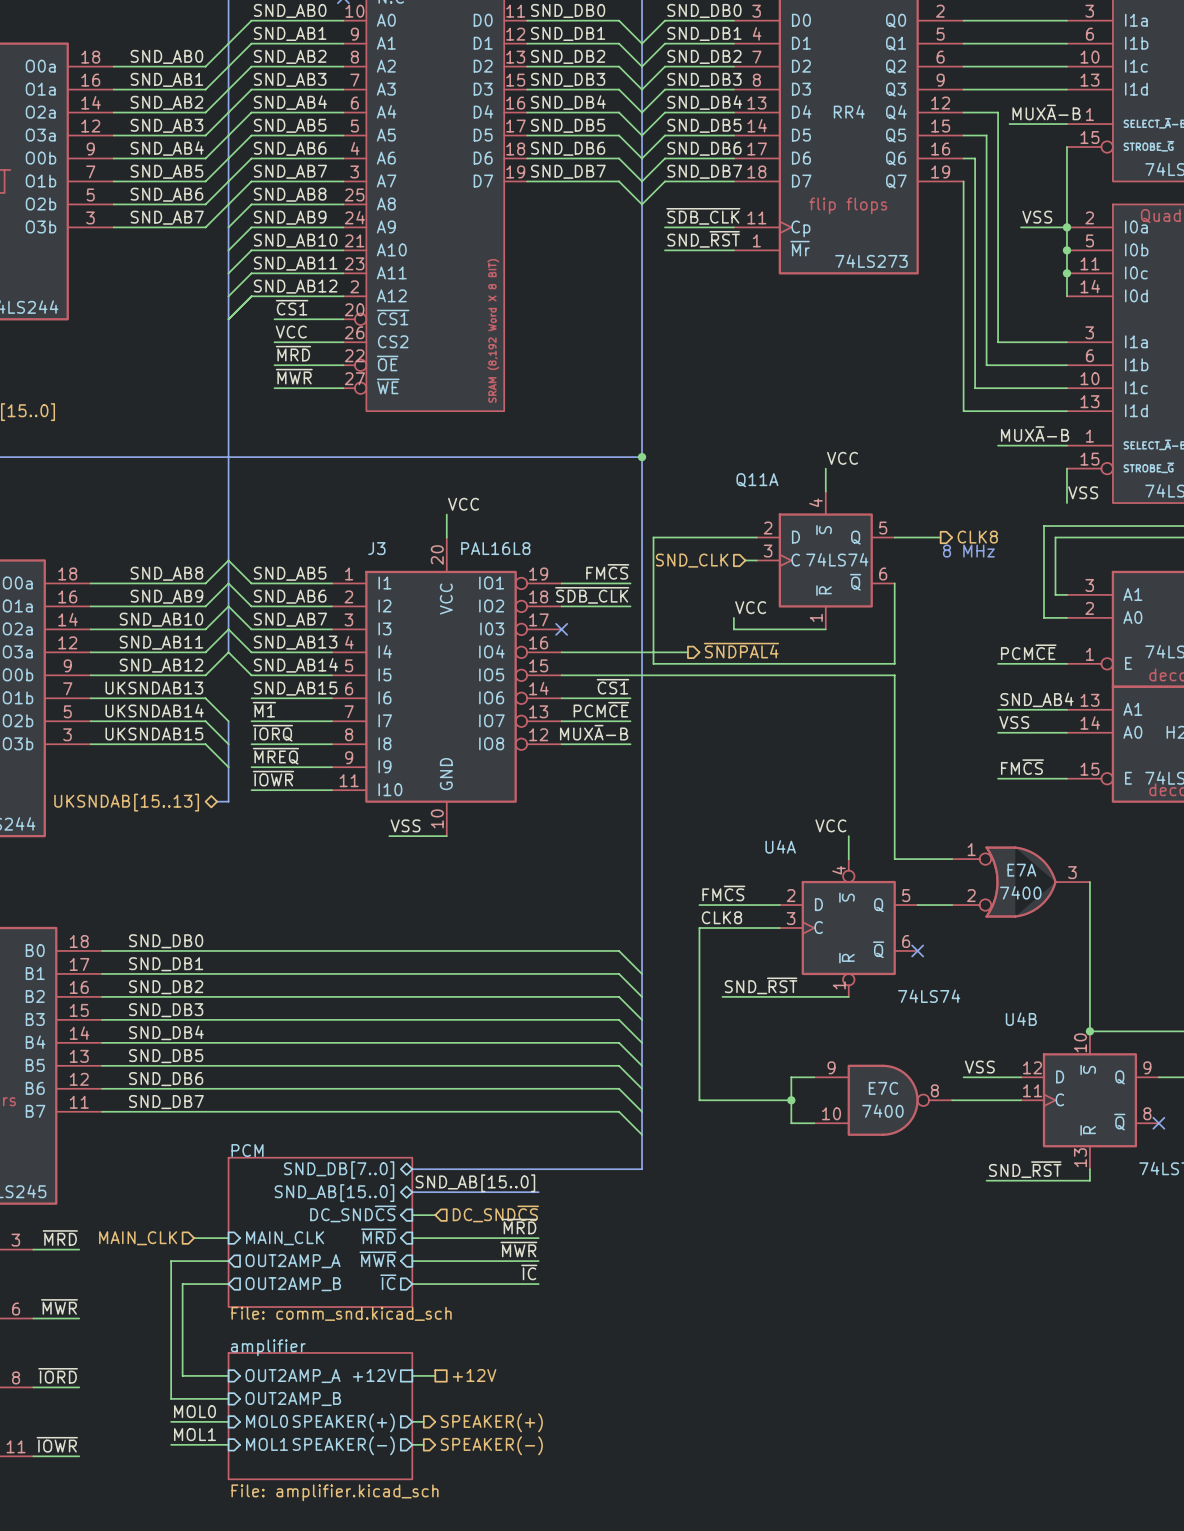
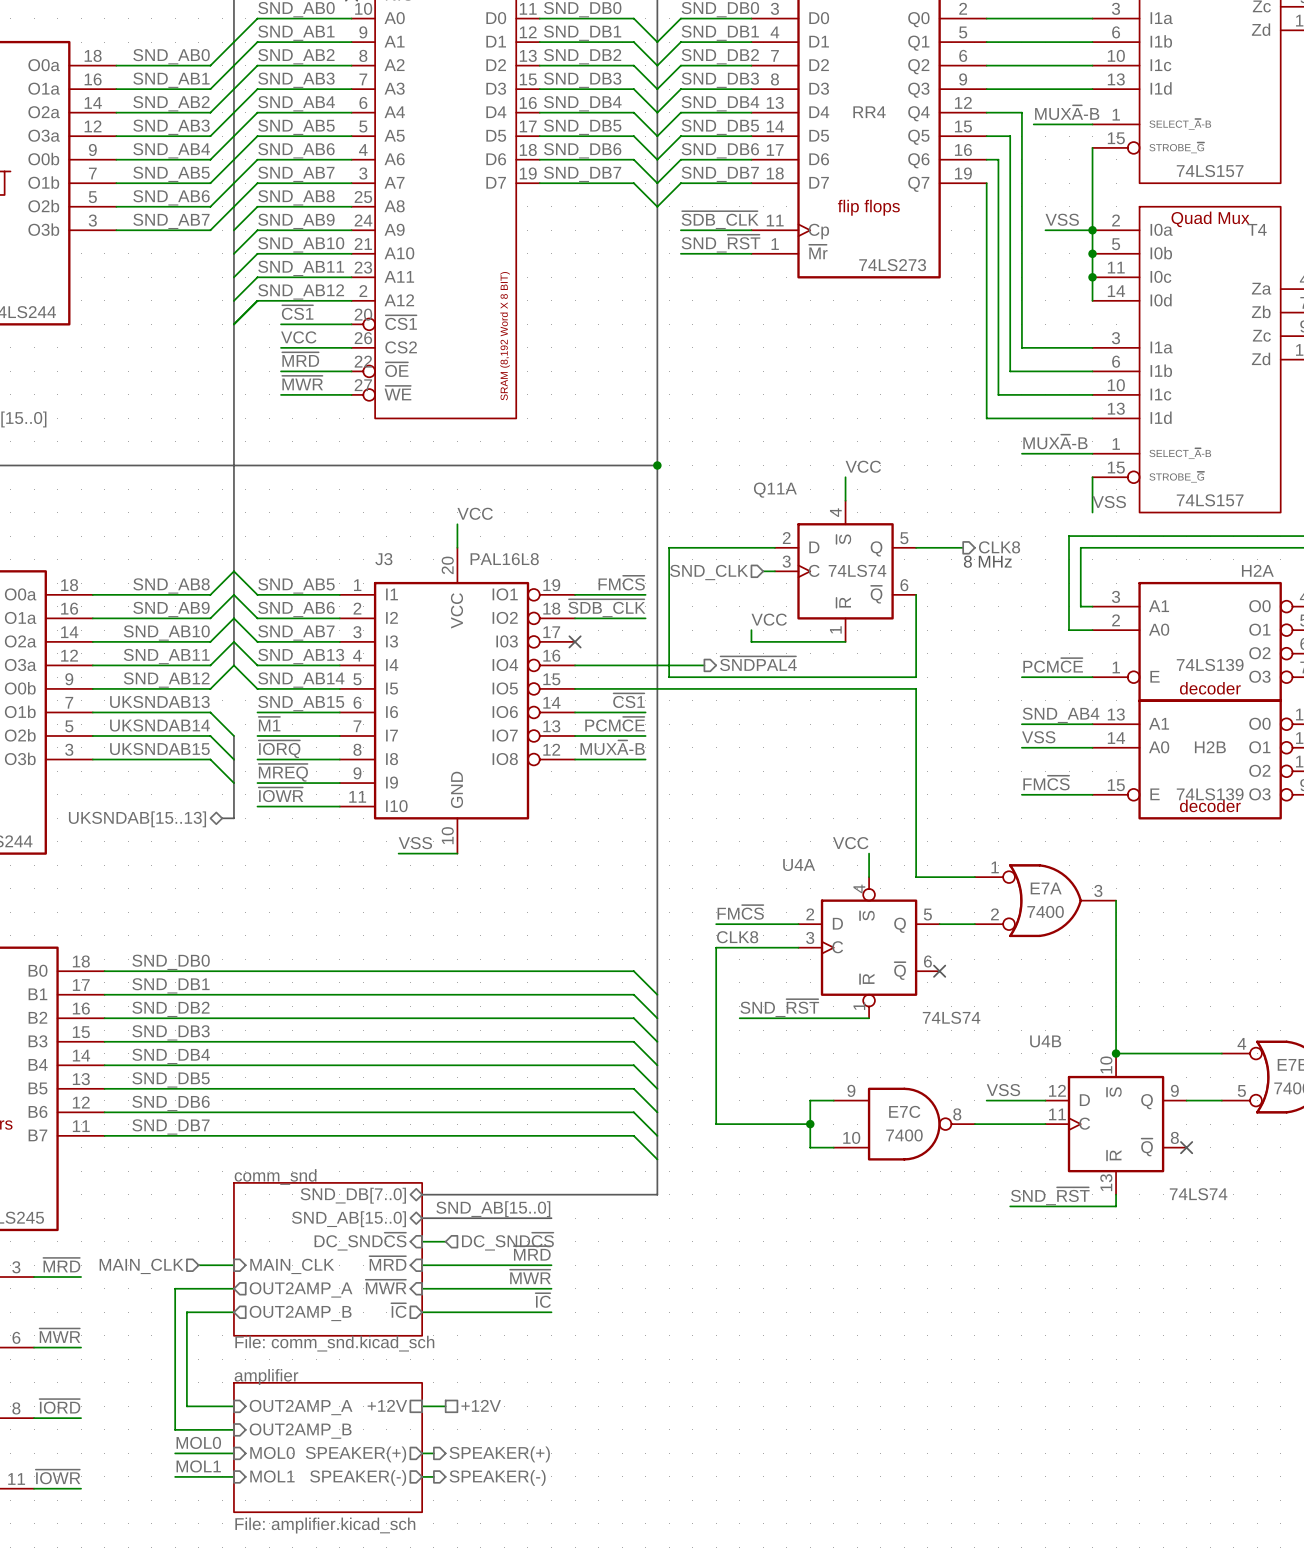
sheet PCM name: PCM (247, 1150) -> comm_snd (275, 1176)

